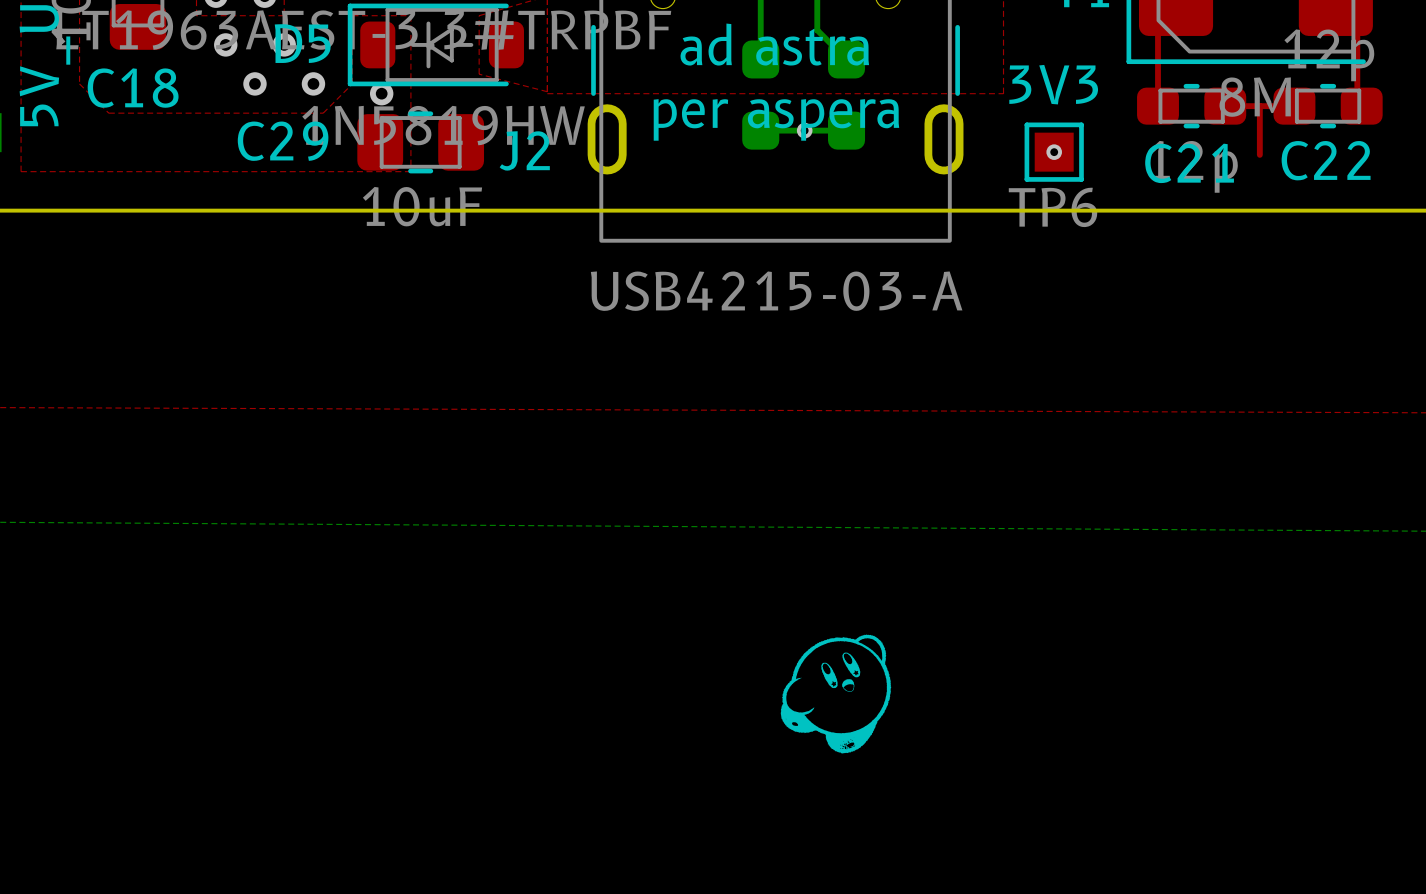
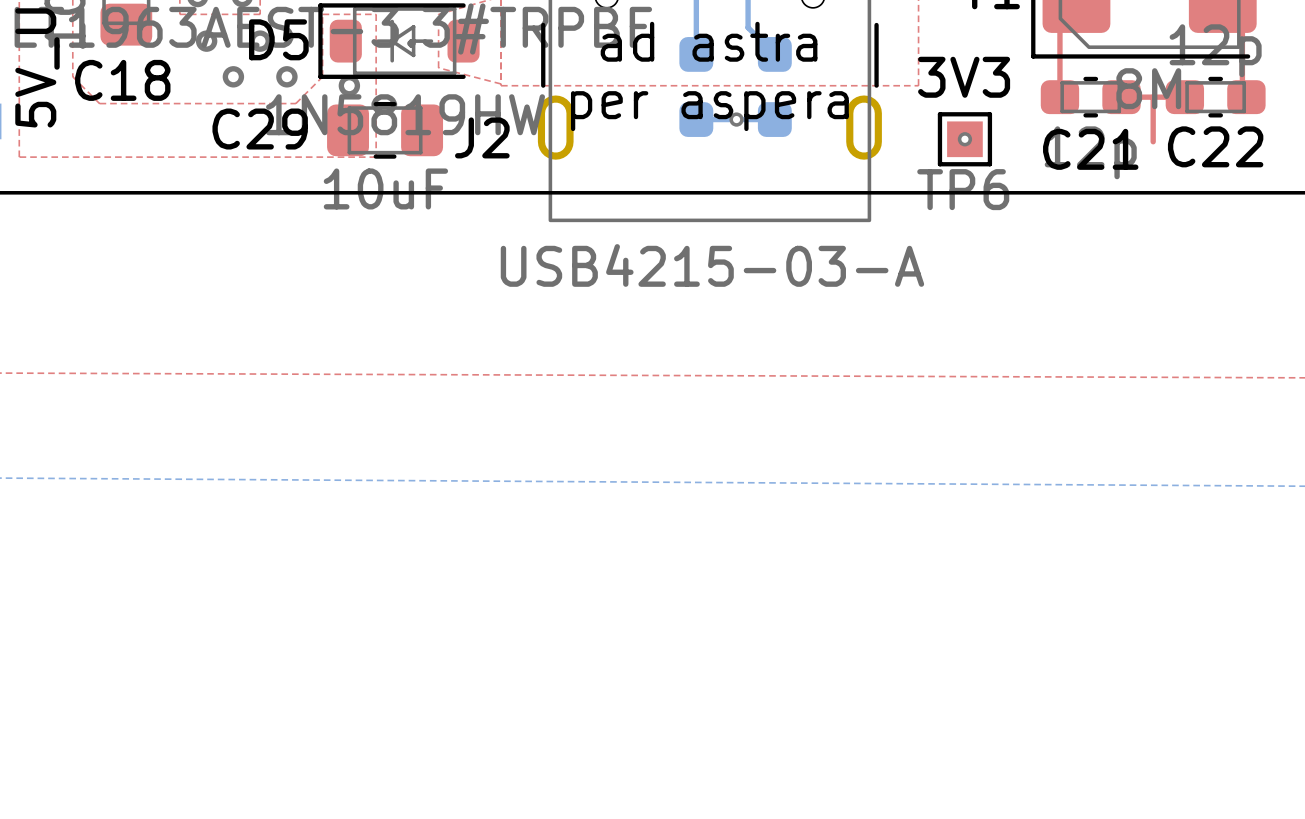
drawing: [780, 634, 892, 754] -> none

